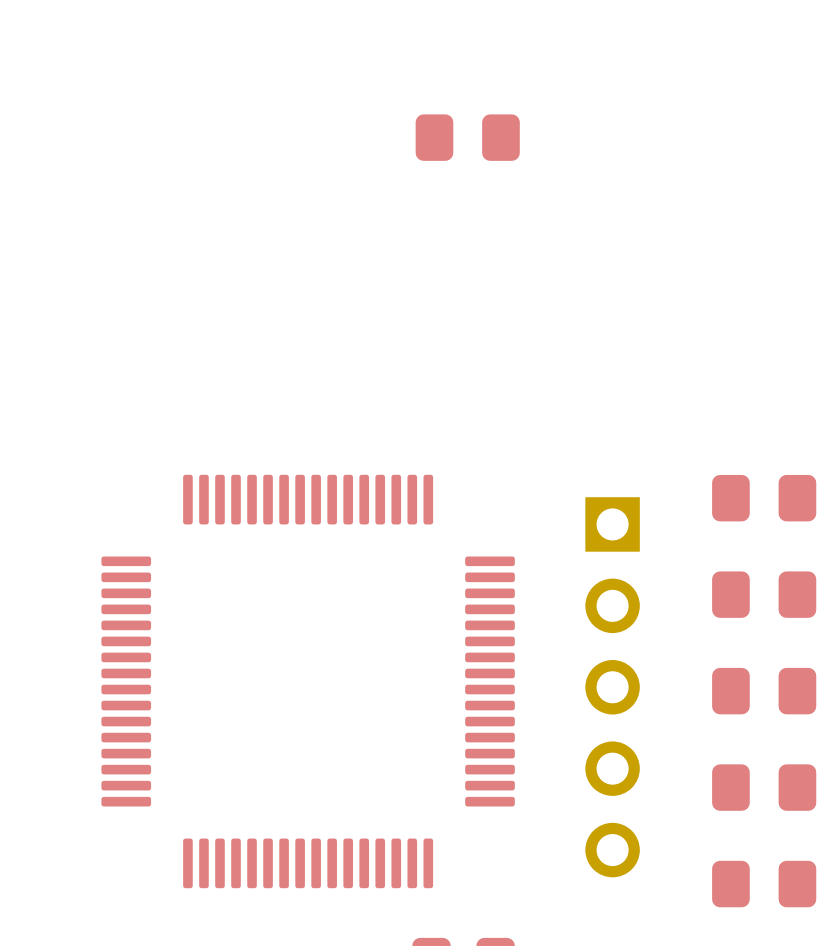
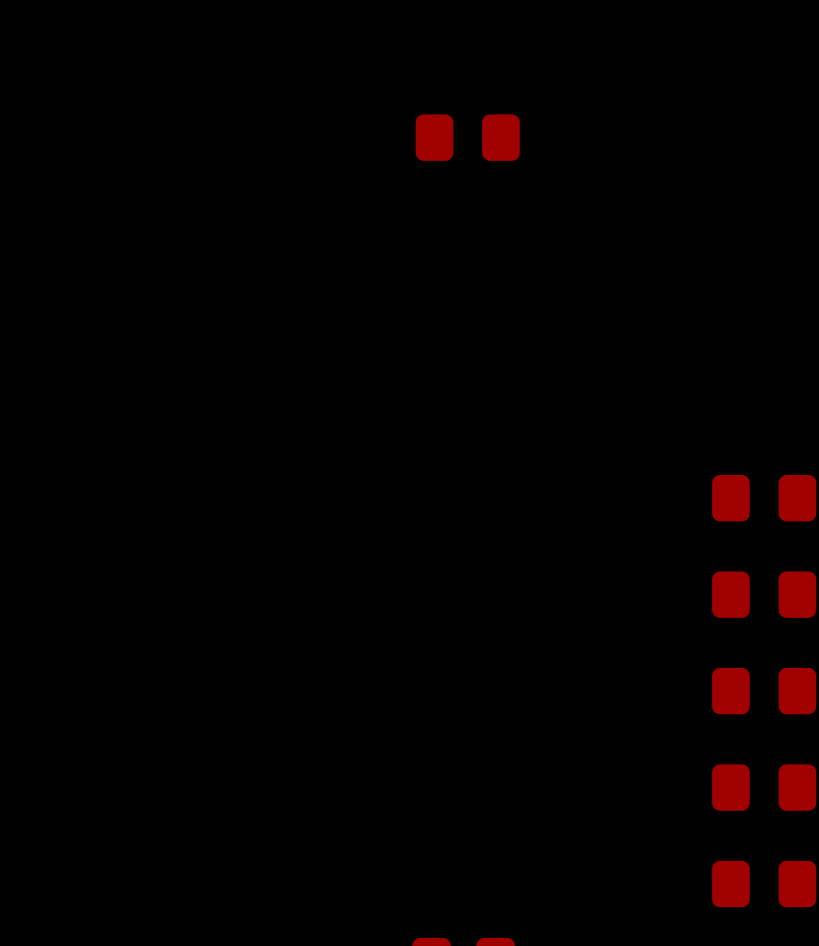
part: (308, 681) -> none
part: (612, 687) -> none

